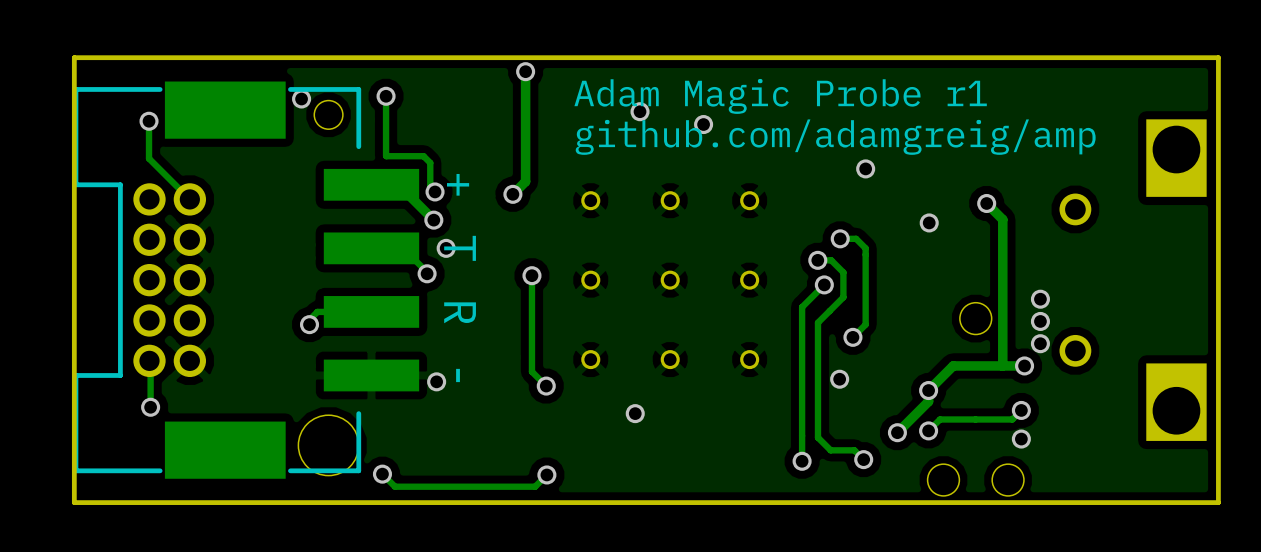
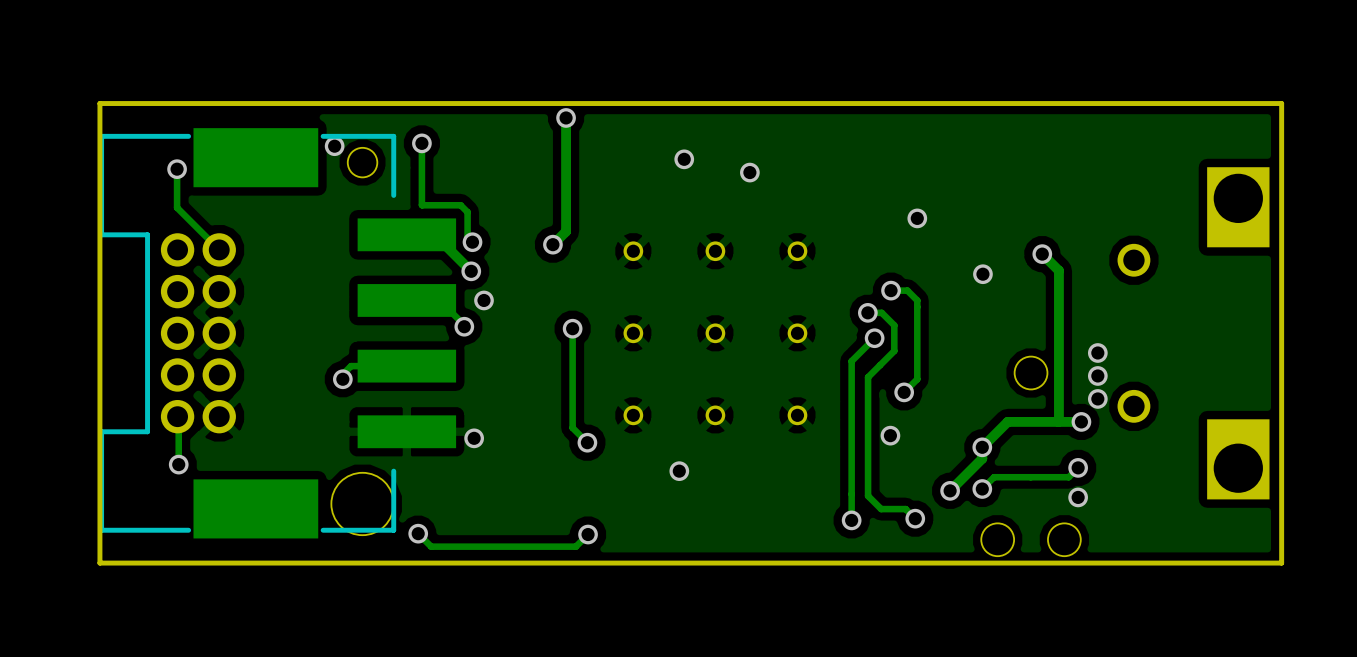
text: Adam Magic Probe r1 (780, 96) -> none
text: github.com/adamgreig/amp (835, 137) -> none
text: + (458, 184) -> none
text: T (460, 248) -> none
text: R (460, 312) -> none
text: - (458, 375) -> none

